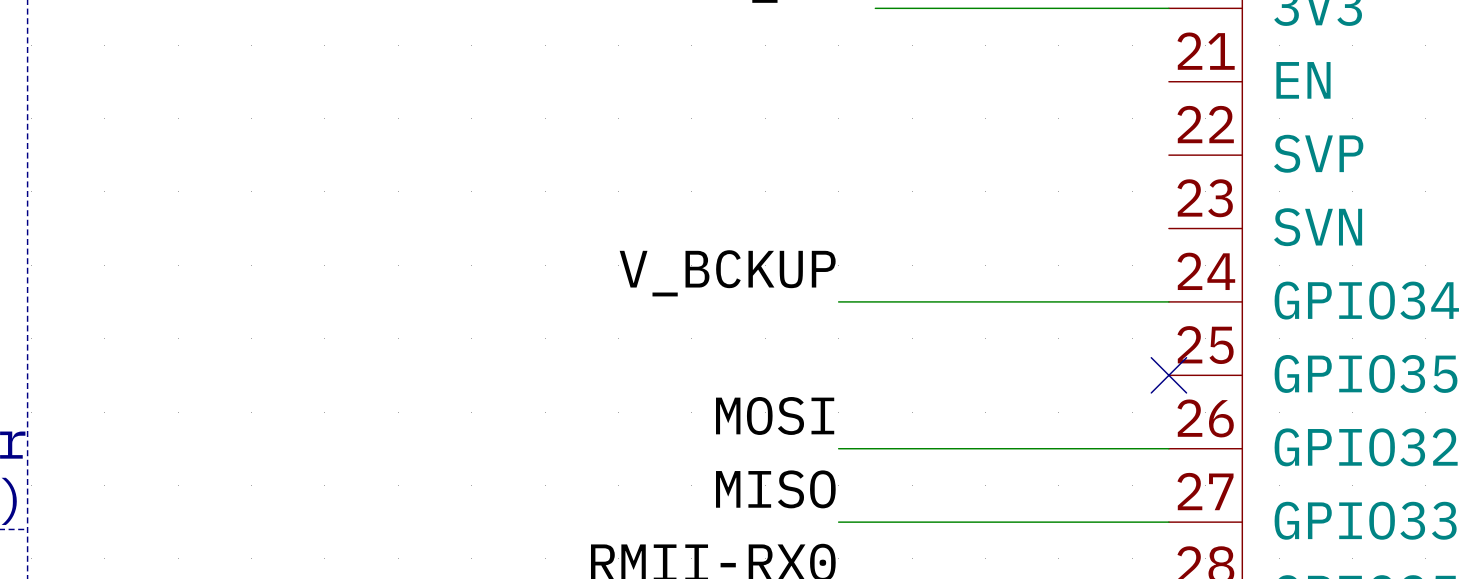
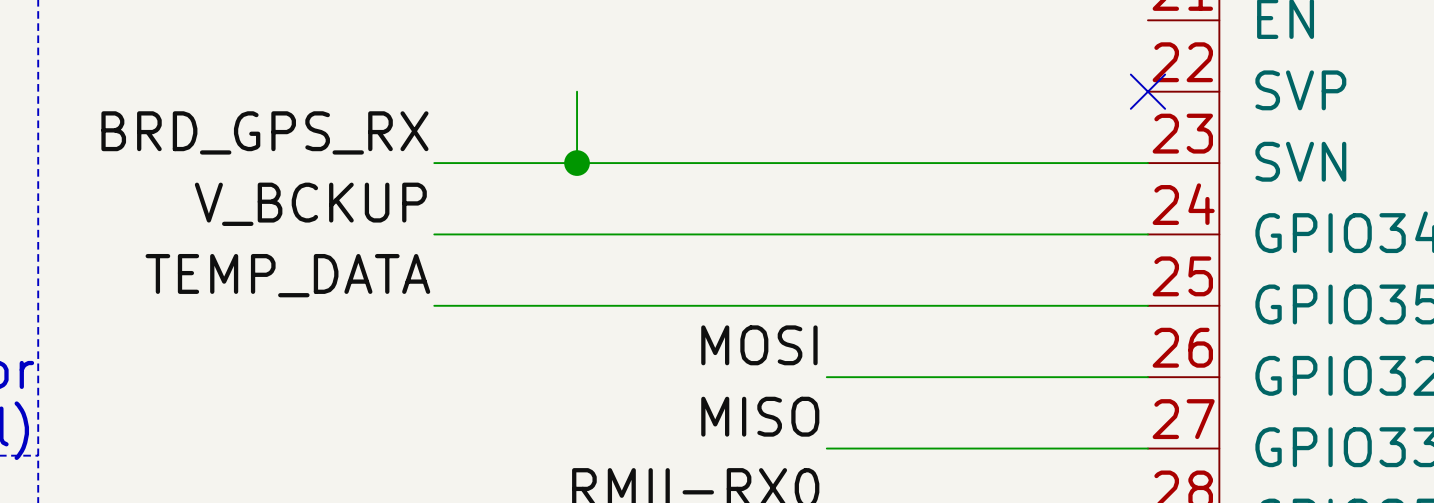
wire: none -> (577, 91) (577, 163)
no-connect mark: none -> (1147, 91)
label: none -> BRD_GPS_RX (264, 132)
wire: none -> (434, 163) (1147, 163)
junction: none -> (577, 163)
label position: V_BCKUP (727, 273) -> V_BCKUP (310, 204)
wire: none -> (434, 234) (826, 234)
label: none -> TEMP_DATA (287, 275)
wire: none -> (434, 305) (1147, 305)
no-connect mark: (1168, 375) -> none

